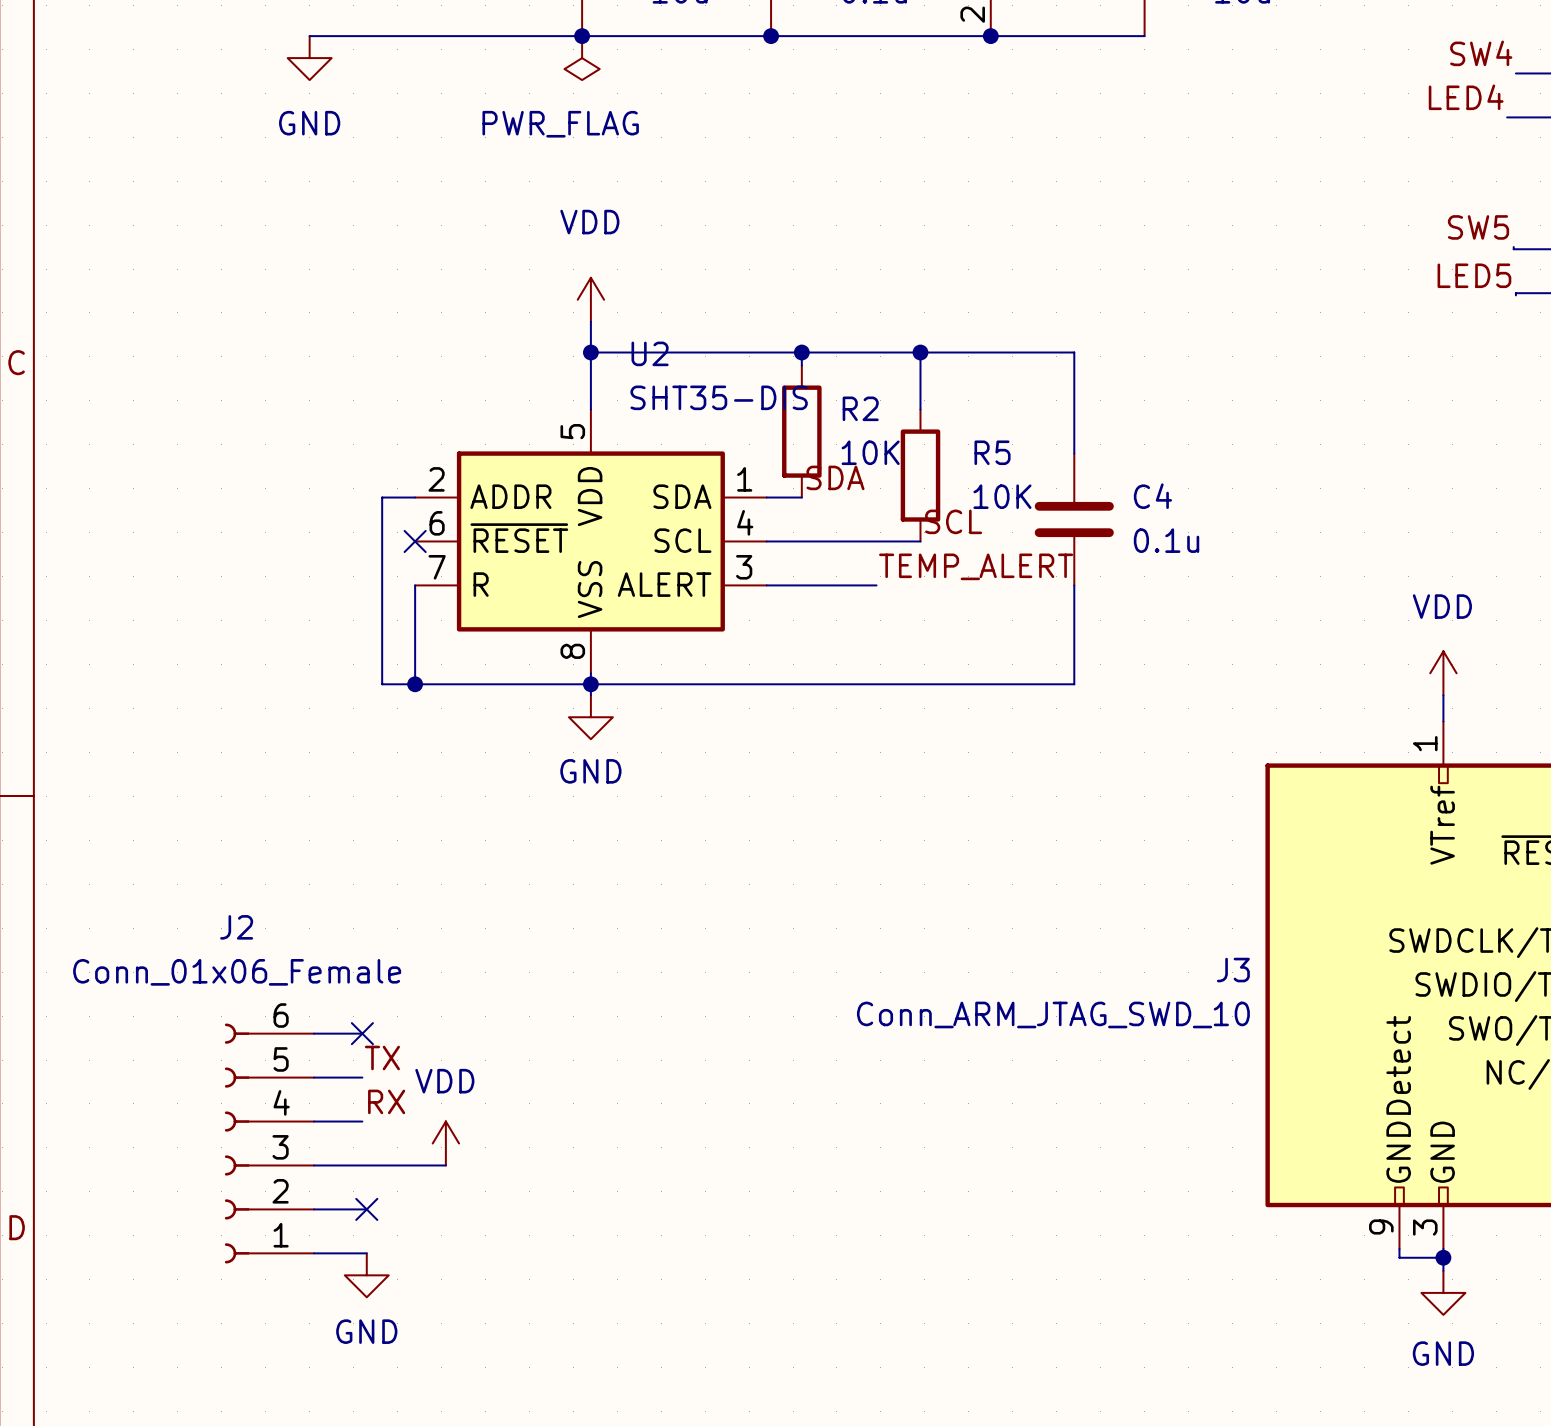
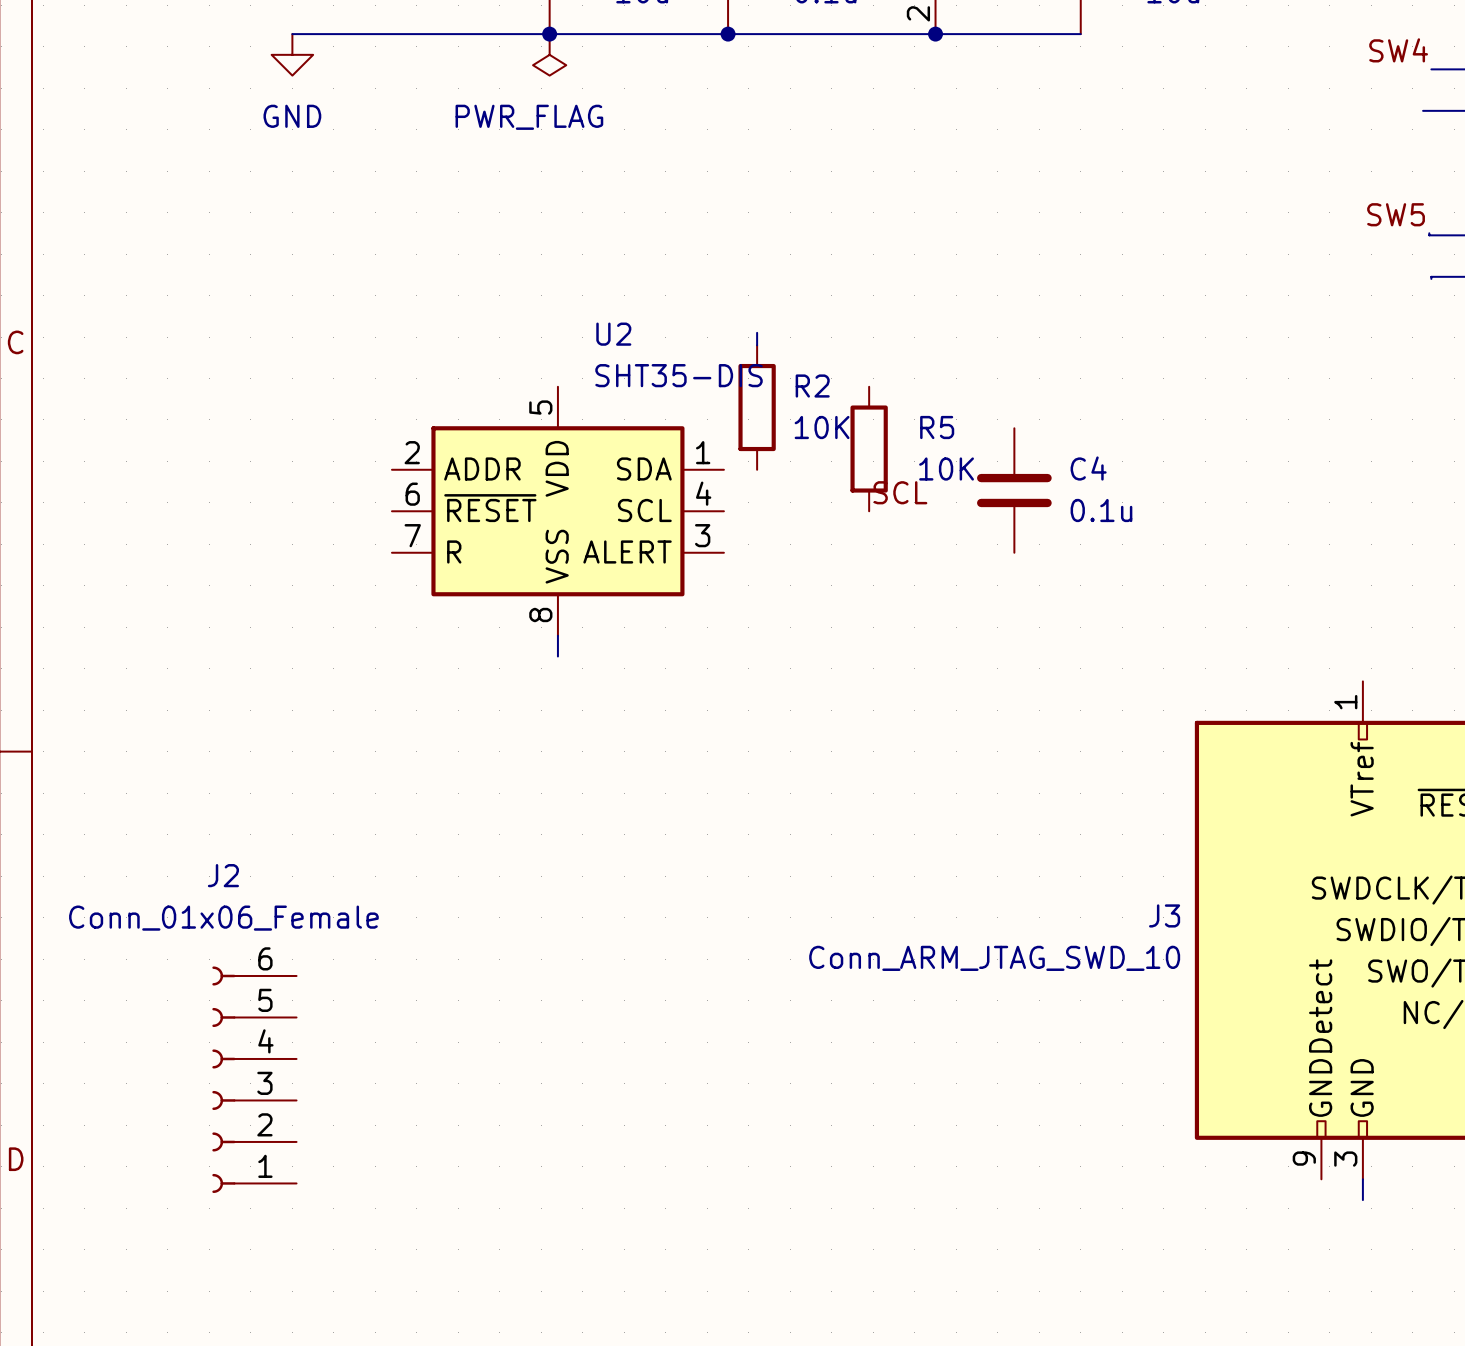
label: LED4 (1466, 97) -> none
label: LED5 (1474, 275) -> none
power symbol: VDD (590, 299) -> none
wire: (590, 321) (590, 409) -> none
wire: (590, 352) (1074, 352) (1074, 453) -> none
junction: (590, 352) -> none
junction: (801, 352) -> none
wire: (920, 352) (920, 409) -> none
junction: (920, 352) -> none
label: SDA (835, 477) -> none
wire: (415, 497) (382, 497) (382, 684) (1074, 684) (1074, 585) -> none
wire: (766, 497) (801, 497) -> none
no-connect mark: (415, 541) -> none
wire: (766, 541) (920, 541) -> none
label: TEMP_ALERT (976, 566) -> none
wire: (415, 585) (415, 684) -> none
wire: (766, 585) (876, 585) -> none
power symbol: VDD (1443, 673) -> none
junction: (415, 684) -> none
junction: (590, 684) -> none
wire: (1443, 695) (1443, 721) -> none
power symbol: GND (590, 717) -> none
wire: (314, 1033) (362, 1033) -> none
no-connect mark: (362, 1033) -> none
label: TX (382, 1057) -> none
wire: (314, 1077) (362, 1077) -> none
label: RX (386, 1101) -> none
wire: (314, 1121) (362, 1121) -> none
power symbol: VDD (445, 1143) -> none
wire: (314, 1165) (445, 1165) -> none
wire: (314, 1209) (366, 1209) -> none
no-connect mark: (366, 1209) -> none
wire: (1399, 1248) (1399, 1257) (1443, 1257) -> none
wire: (314, 1253) (366, 1253) -> none
junction: (1443, 1257) -> none
power symbol: GND (366, 1275) -> none
power symbol: GND (1443, 1292) -> none

